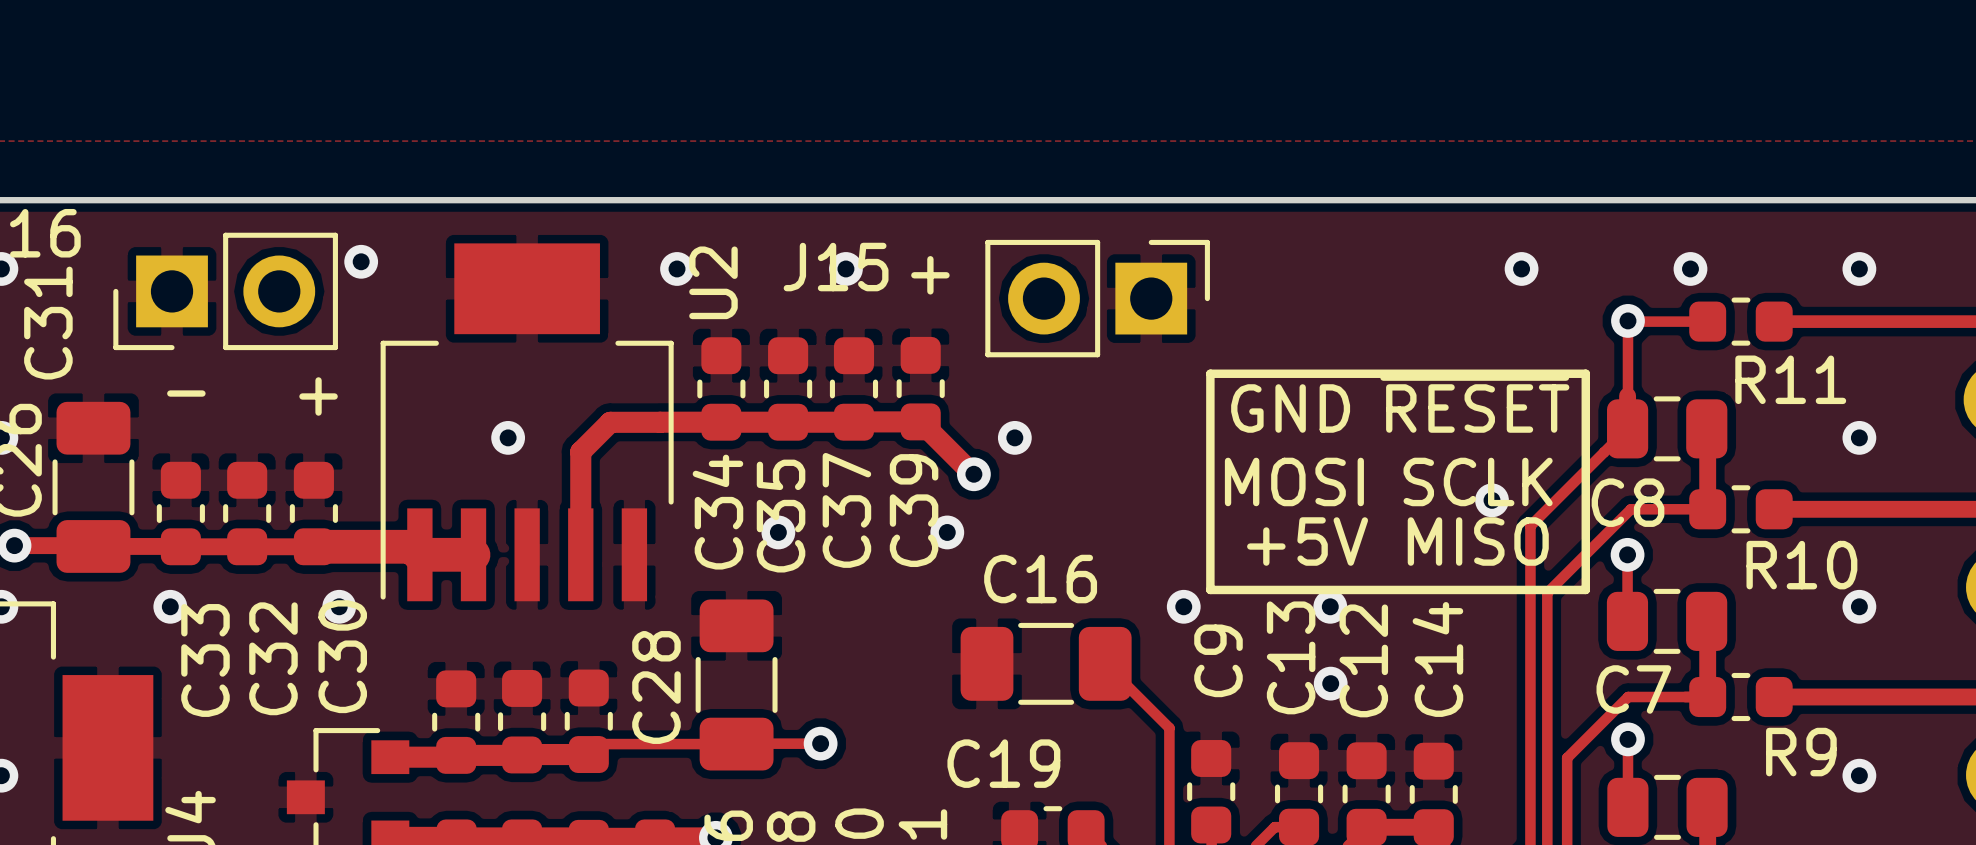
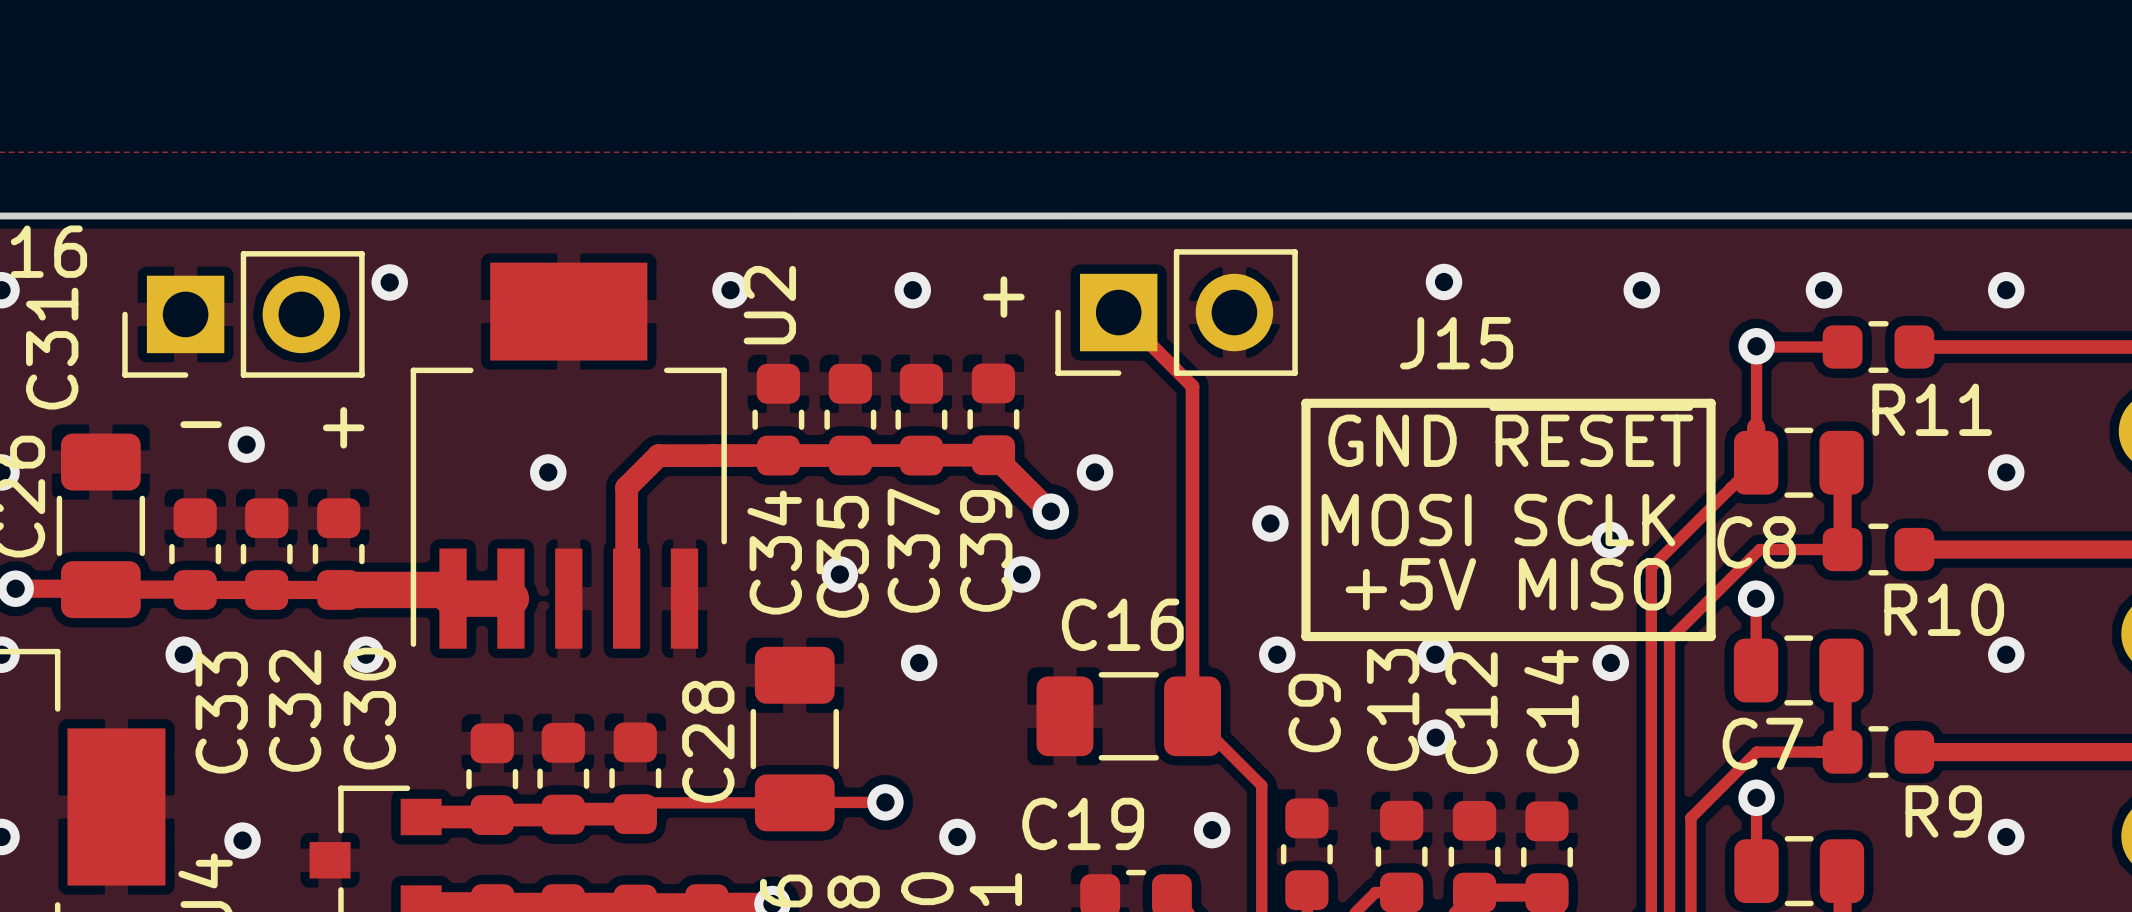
via: none -> (1444, 282)
track: none -> (1118, 312) (1192, 386) (1192, 716)
J15 rotation: 0° (1097, 298) -> 180° (1176, 312)
via: none -> (246, 444)
via: none -> (1270, 523)
via: none -> (919, 662)
via: none -> (1610, 662)
via: none -> (1212, 830)
via: none -> (957, 836)
via: none -> (242, 840)

